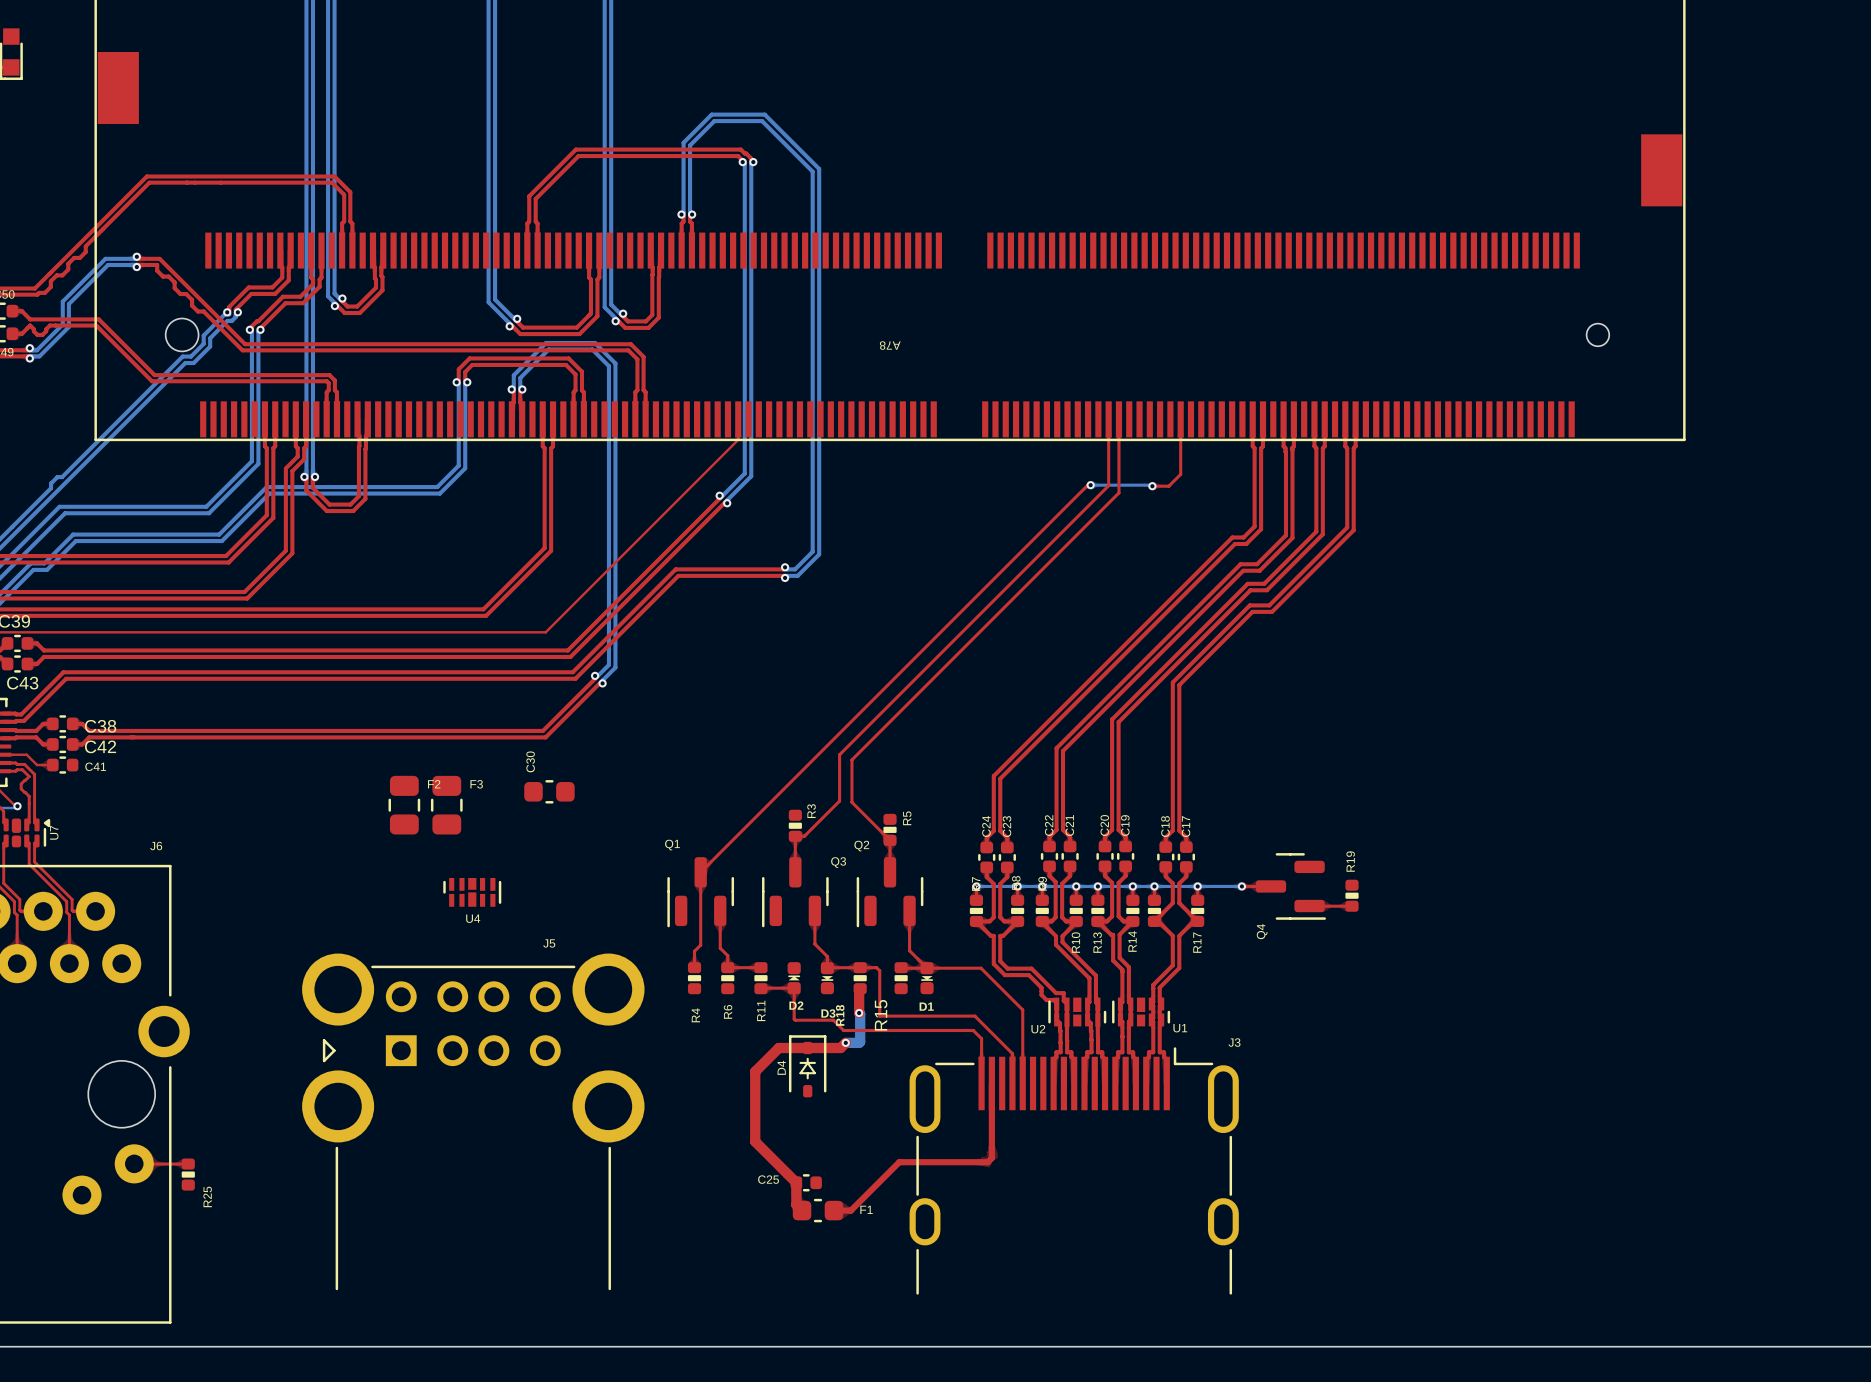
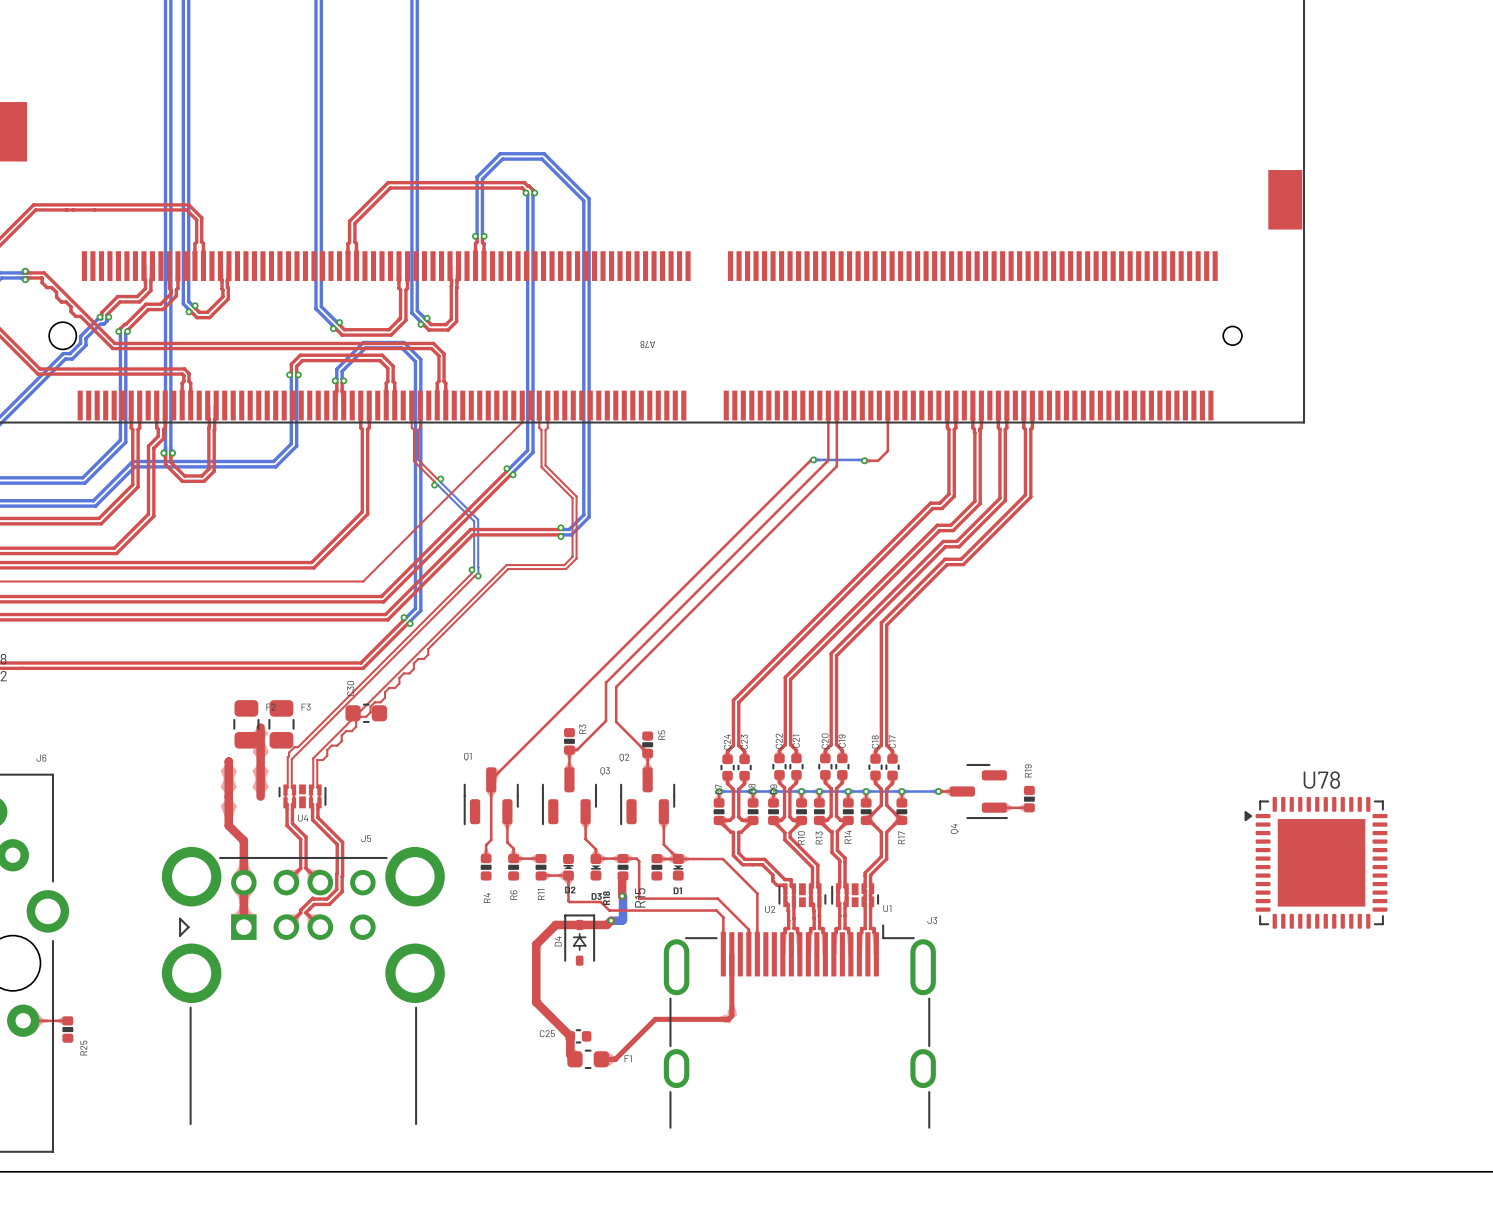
top track: none -> (411, 405) (413, 461) (434, 481) (434, 485)
top track: none -> (420, 405) (418, 459) (437, 478) (440, 478)
top track: none -> (539, 405) (541, 467) (572, 498) (572, 556) (564, 565) (506, 565) (313, 758) (313, 787) (311, 789) (312, 819) (337, 844) (336, 889) (327, 899) (312, 898) (286, 927)
top track: none -> (547, 405) (545, 465) (576, 496) (576, 558) (566, 569) (508, 569) (428, 649) (428, 654) (423, 659) (418, 659) (413, 663) (413, 669) (409, 673) (403, 673) (394, 687) (389, 687) (380, 702) (374, 702) (366, 716) (360, 716) (351, 731) (346, 731) (337, 745) (331, 745) (322, 760) (317, 760) (317, 787) (319, 789) (317, 817) (342, 842) (342, 891) (329, 904) (314, 904) (306, 912) (320, 927)
bottom track: none -> (440, 478) (440, 482) (478, 519) (478, 567)
via: none -> (440, 478)
bottom track: none -> (434, 485) (437, 485) (474, 521) (474, 567) (471, 569)
via: none -> (434, 485)
bottom track: none -> (478, 567) (478, 572)
top track: none -> (471, 569) (471, 573) (298, 747) (294, 747) (289, 752) (287, 787) (285, 789) (287, 825) (300, 839) (300, 868) (286, 882)
via: none -> (471, 569)
top track: none -> (478, 576) (474, 576) (291, 759) (291, 787) (294, 789) (292, 823) (306, 837) (306, 868) (320, 882)
via: none -> (478, 576)
top track: none -> (260, 727) (260, 796)
top track: none -> (228, 761) (228, 825) (243, 840) (243, 927)
U78: none -> (1315, 862)

